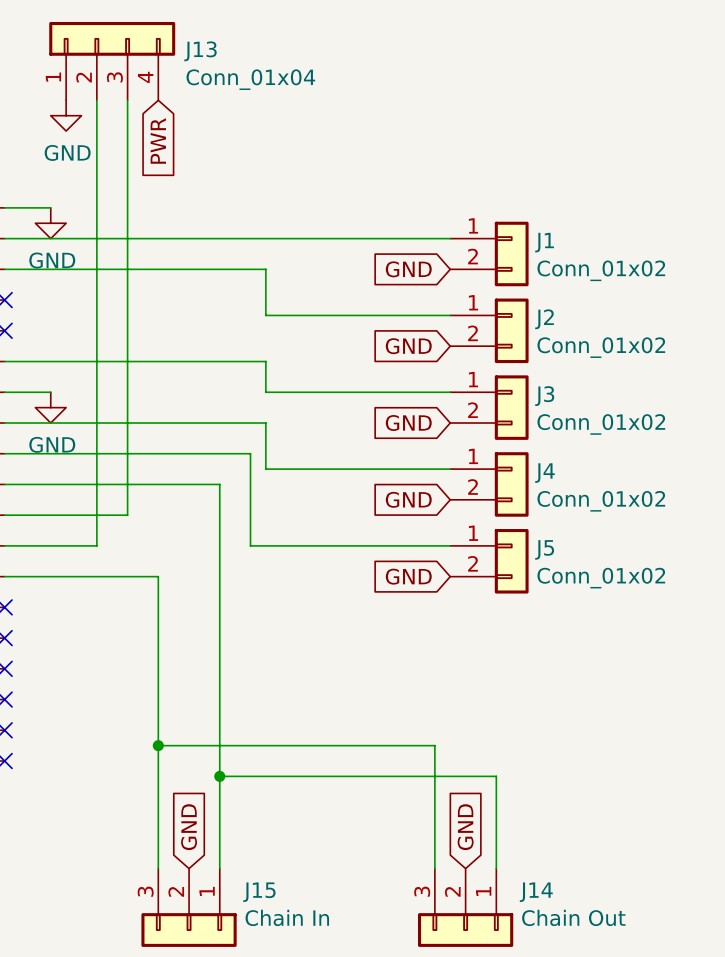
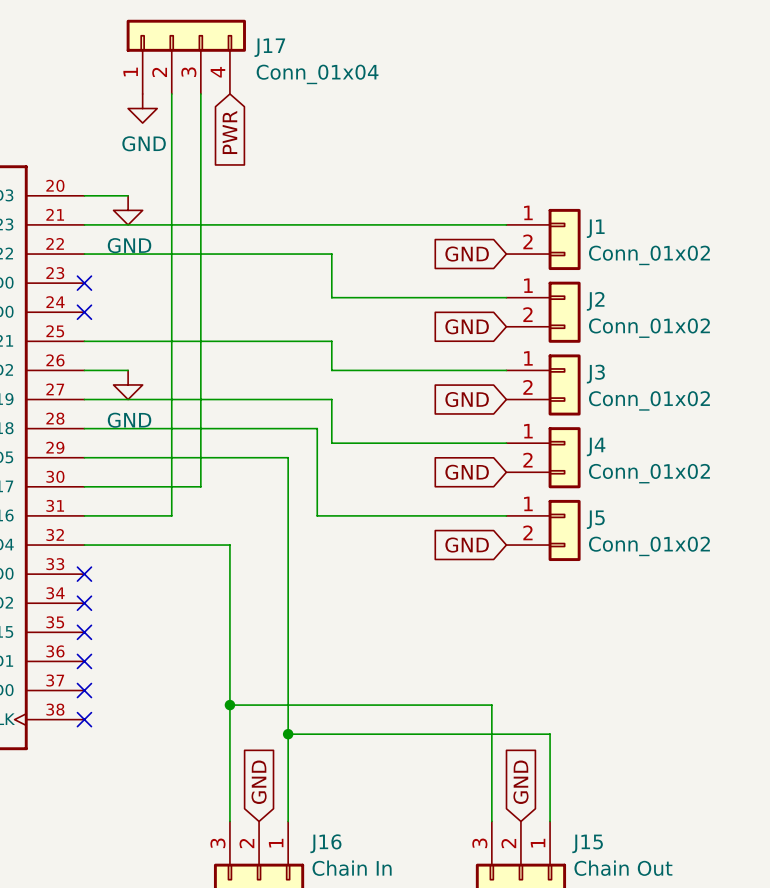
J13 name: J13 (200, 51) -> J17 (269, 47)
J15 name: J15 (259, 892) -> J16 (325, 843)
J14 name: J14 (536, 892) -> J15 (587, 843)

